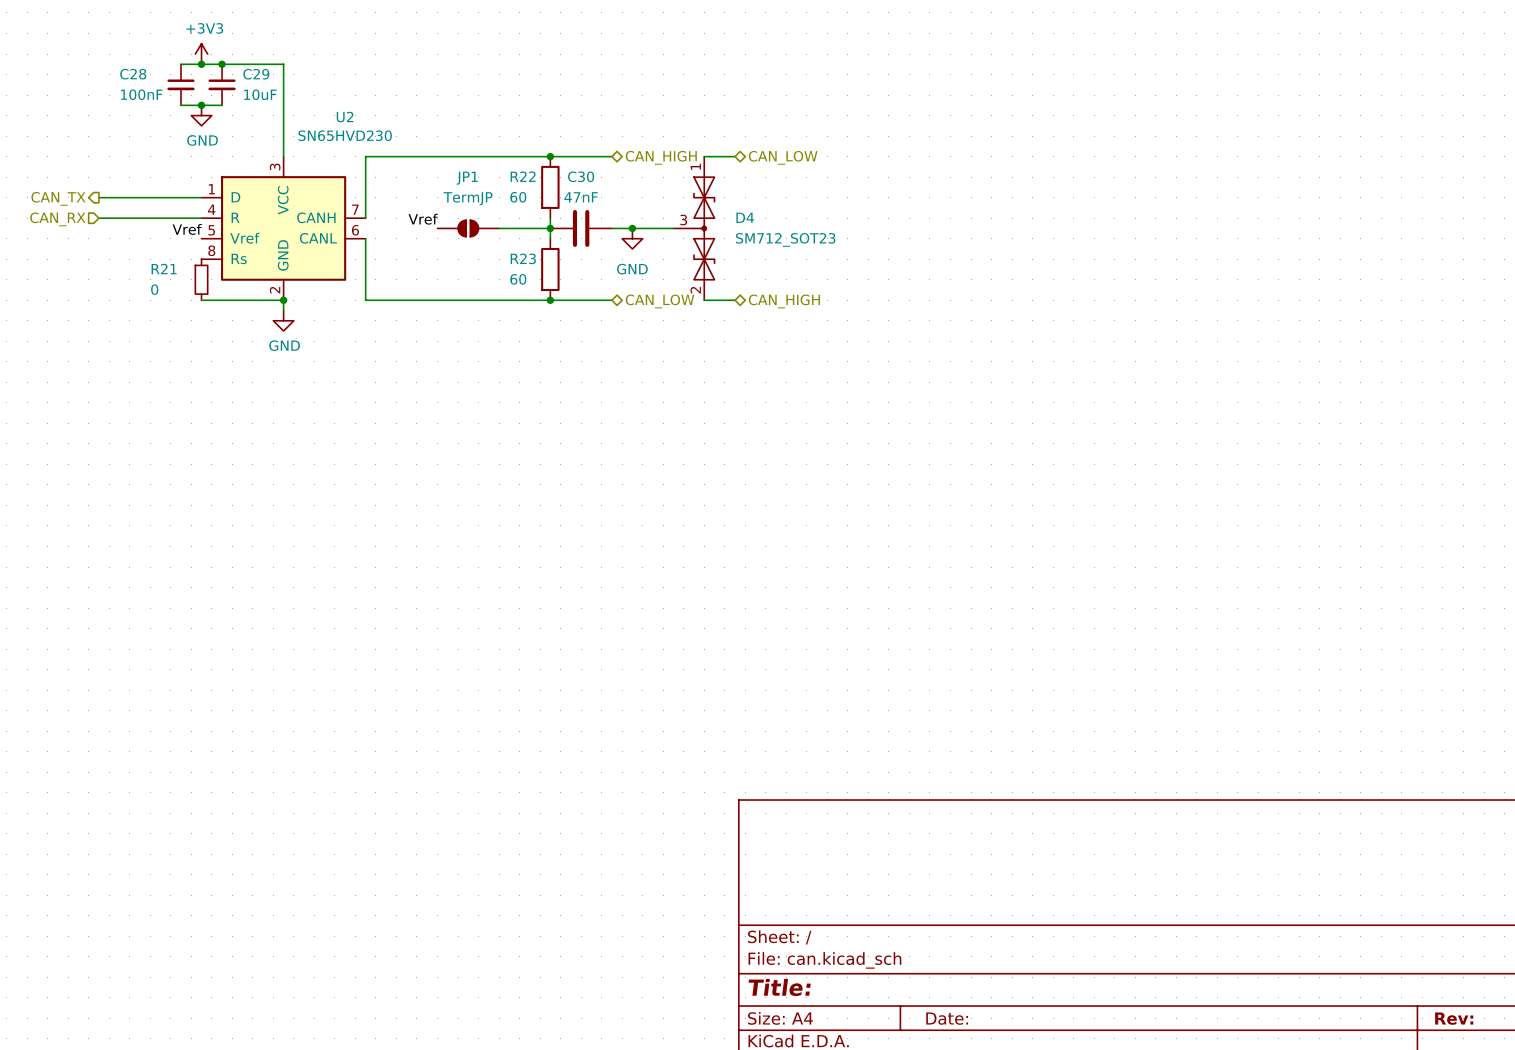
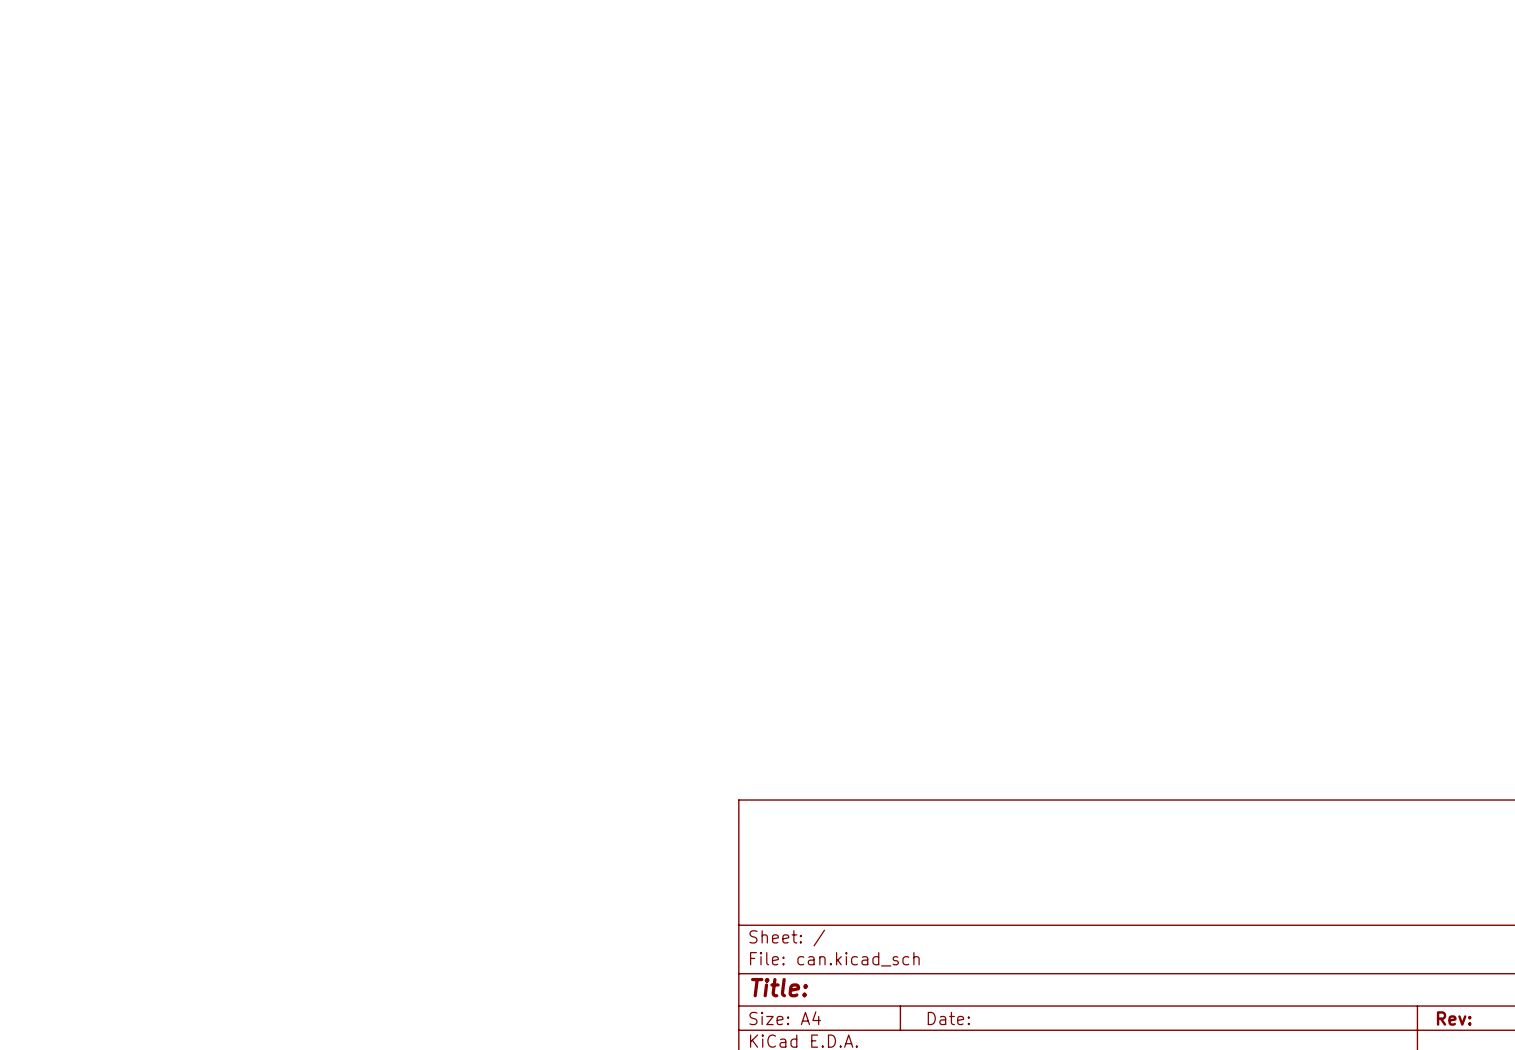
power symbol: +3V3 (201, 54) -> none
wire: (181, 64) (283, 64) (283, 156) -> none
junction: (201, 64) -> none
junction: (222, 64) -> none
C28: 100nF (181, 84) -> none
C29: 10uF (222, 84) -> none
wire: (181, 105) (222, 105) -> none
junction: (201, 105) -> none
power symbol: GND (201, 115) -> none
junction: (550, 156) -> none
wire: (611, 156) (365, 156) (365, 218) -> none
wire: (704, 156) (735, 156) -> none
hierarchical label: CAN_HIGH (661, 157) -> none
hierarchical label: CAN_LOW (783, 157) -> none
R22: 60 (550, 187) -> none
wire: (98, 197) (201, 197) -> none
hierarchical label: CAN_TX (58, 198) -> none
wire: (98, 218) (201, 218) -> none
wire: (550, 218) (550, 238) -> none
hierarchical label: CAN_RX (57, 219) -> none
label: Vref (423, 219) -> none
U2: SN65HVD230 (283, 228) -> none
JP1: TermJP (468, 228) -> none
wire: (499, 228) (550, 228) -> none
junction: (550, 228) -> none
C30: 47nF (581, 228) -> none
wire: (611, 228) (673, 228) -> none
junction: (632, 228) -> none
D4: SM712_SOT23 (694, 228) -> none
label: Vref (187, 229) -> none
wire: (365, 238) (365, 300) (611, 300) -> none
power symbol: GND (632, 238) -> none
R23: 60 (550, 269) -> none
R21: 0 (201, 279) -> none
wire: (201, 300) (283, 300) (283, 310) -> none
junction: (283, 300) -> none
junction: (550, 300) -> none
wire: (704, 300) (735, 300) -> none
hierarchical label: CAN_LOW (660, 301) -> none
hierarchical label: CAN_HIGH (784, 301) -> none
power symbol: GND (283, 320) -> none

